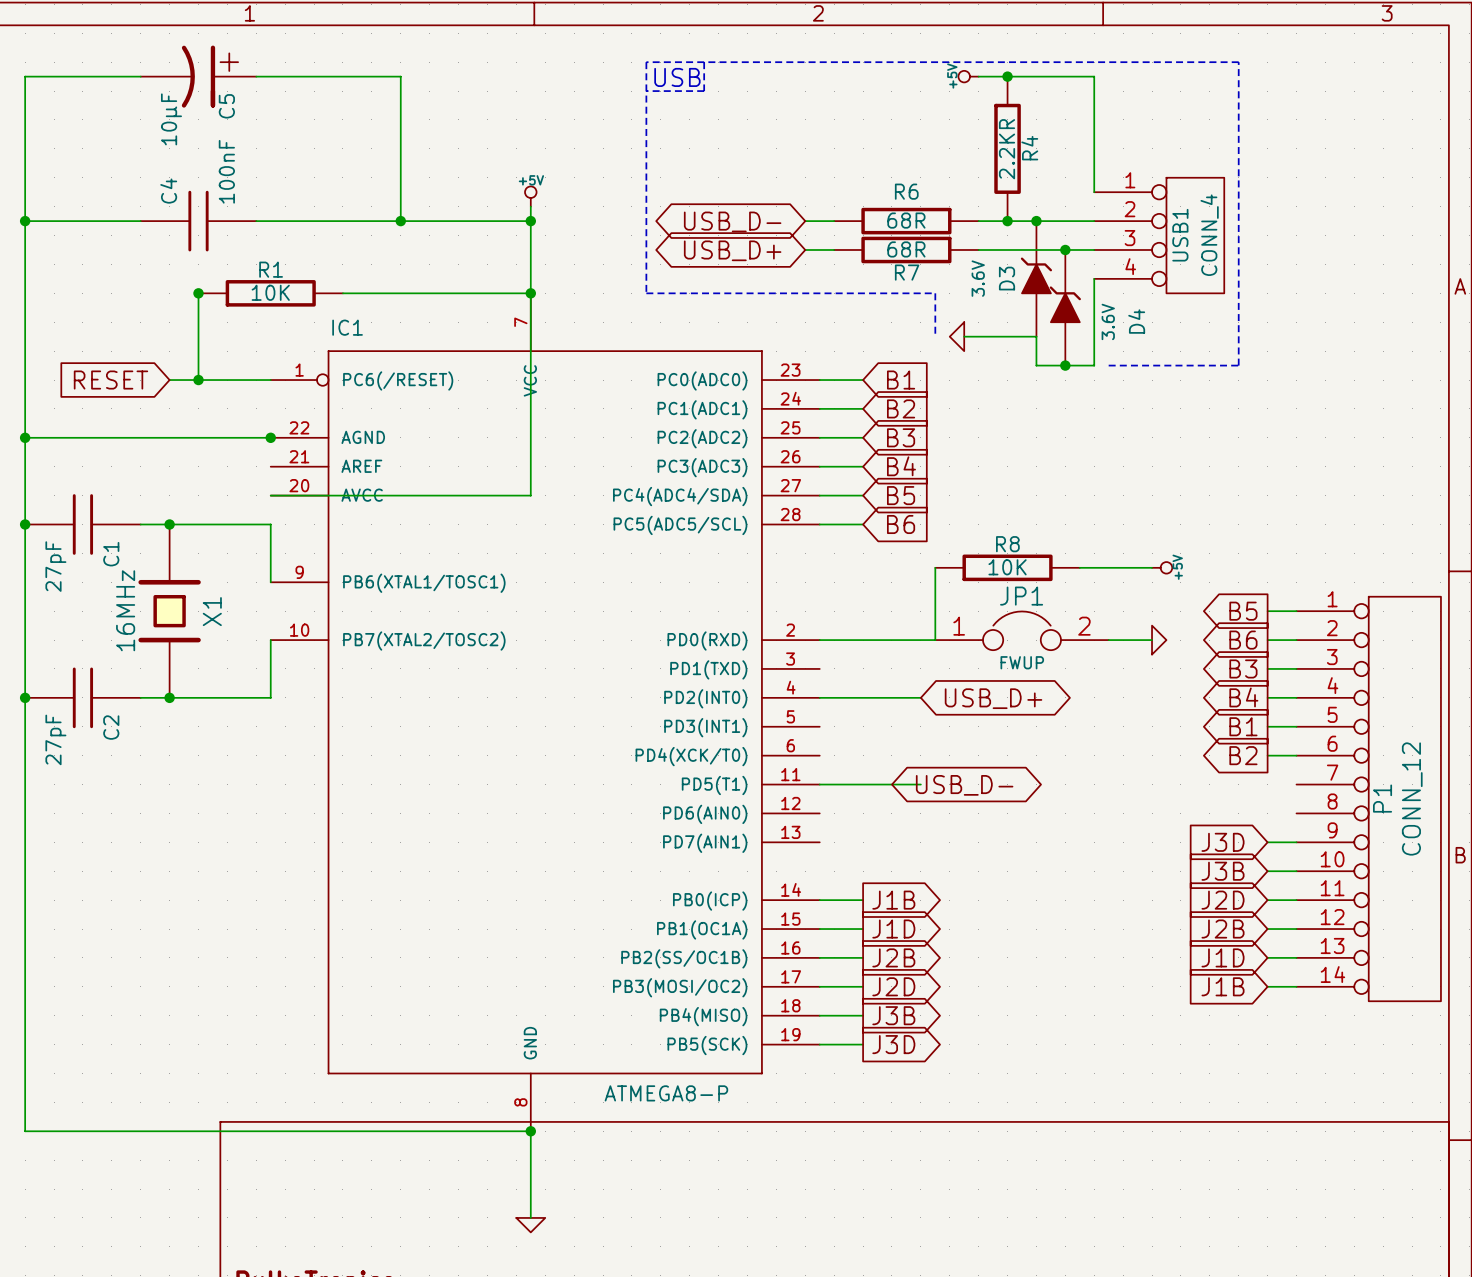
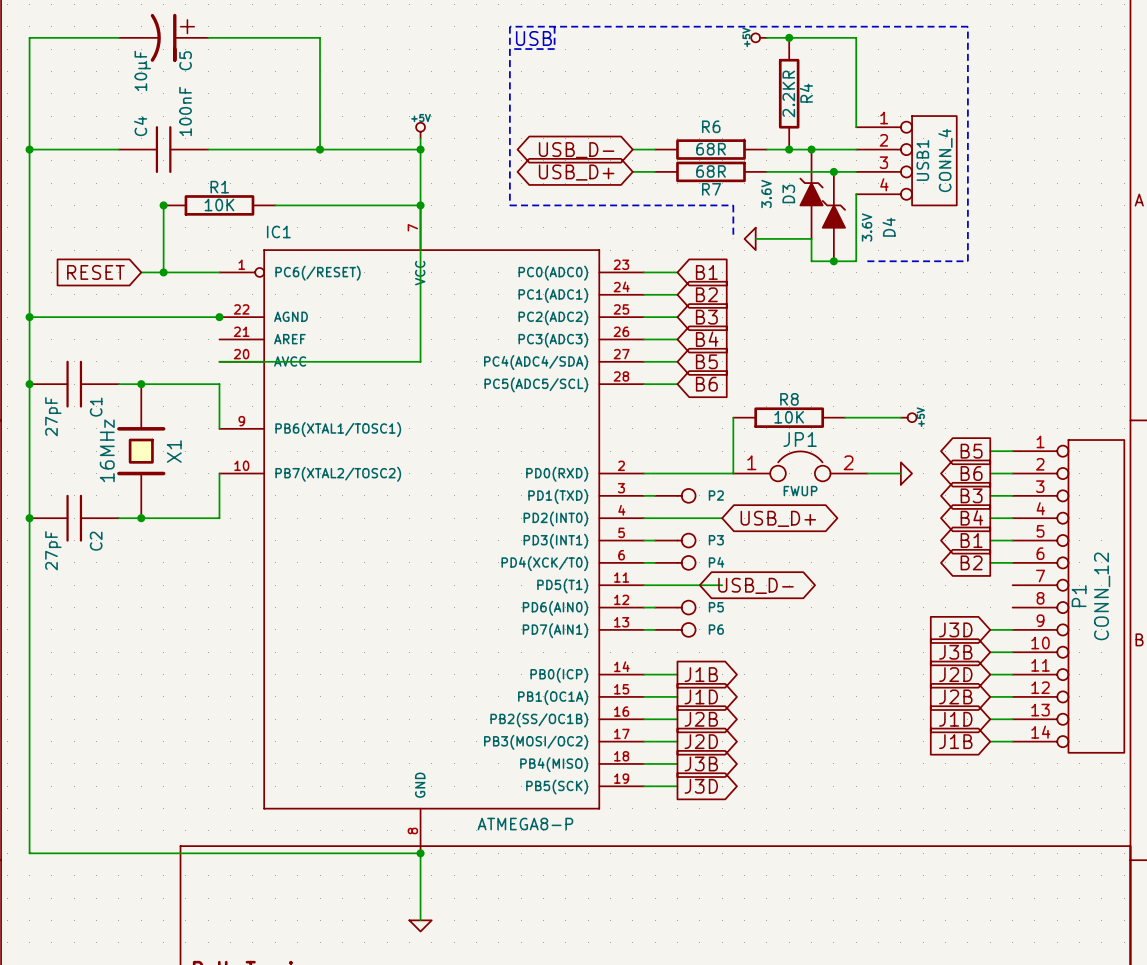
wire: none -> (643, 495) (655, 495)
P2: none -> (675, 495)
wire: none -> (643, 540) (655, 540)
P3: none -> (675, 540)
wire: none -> (643, 562) (655, 562)
P4: none -> (675, 562)
wire: none -> (643, 607) (655, 607)
P5: none -> (675, 607)
wire: none -> (643, 629) (655, 629)
P6: none -> (675, 629)

